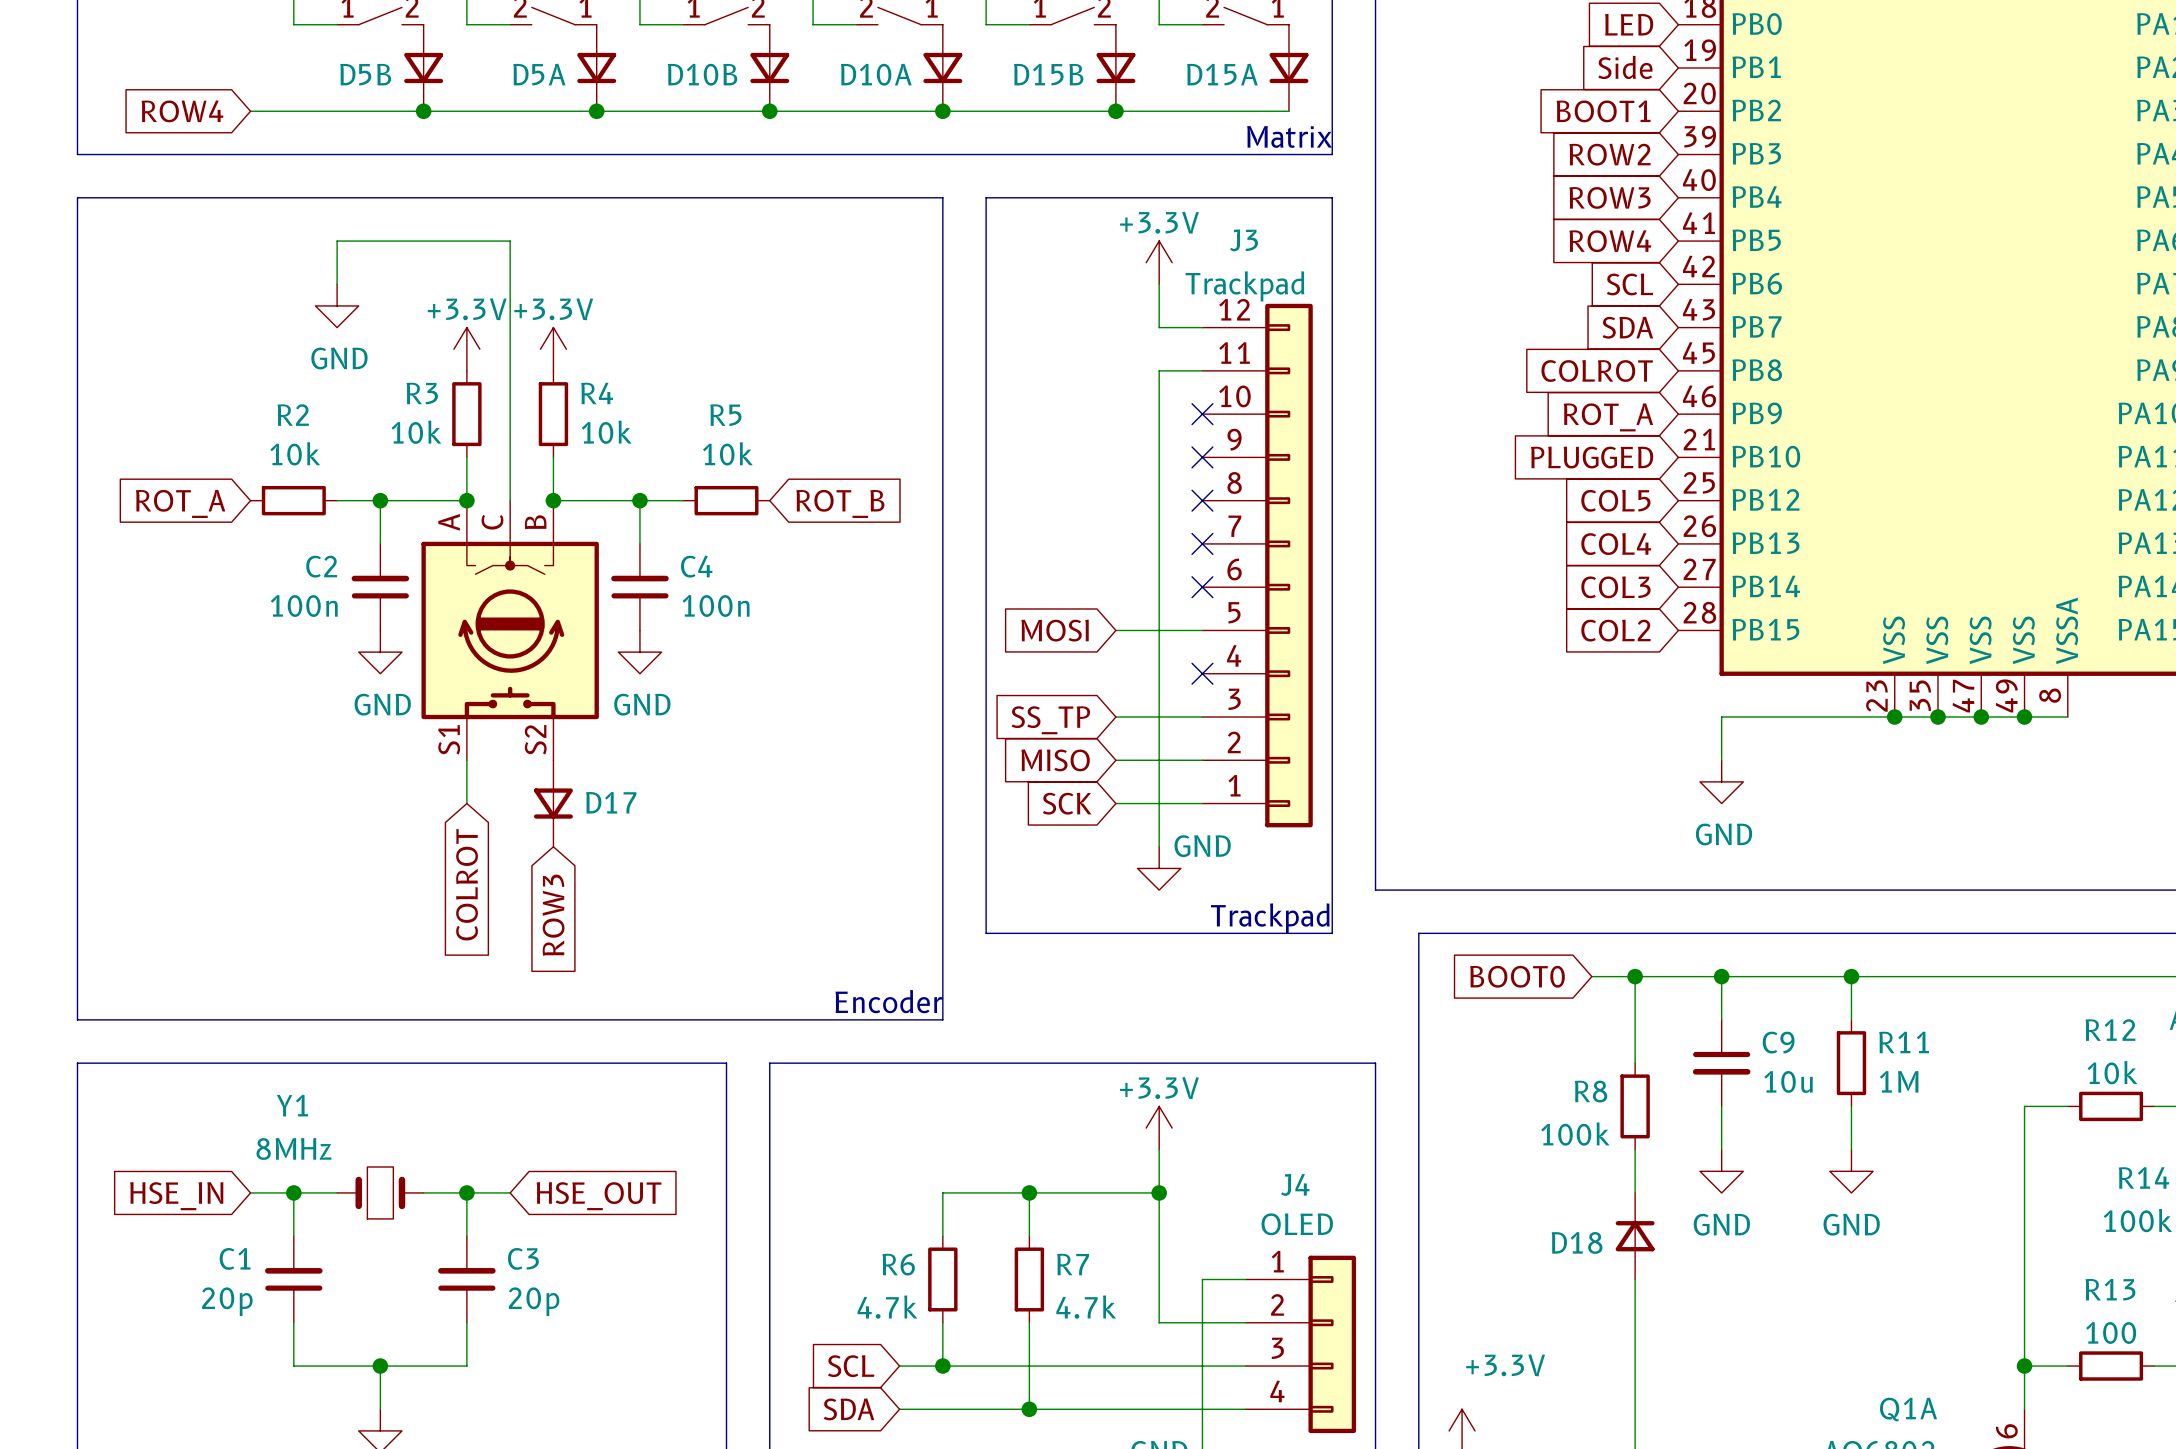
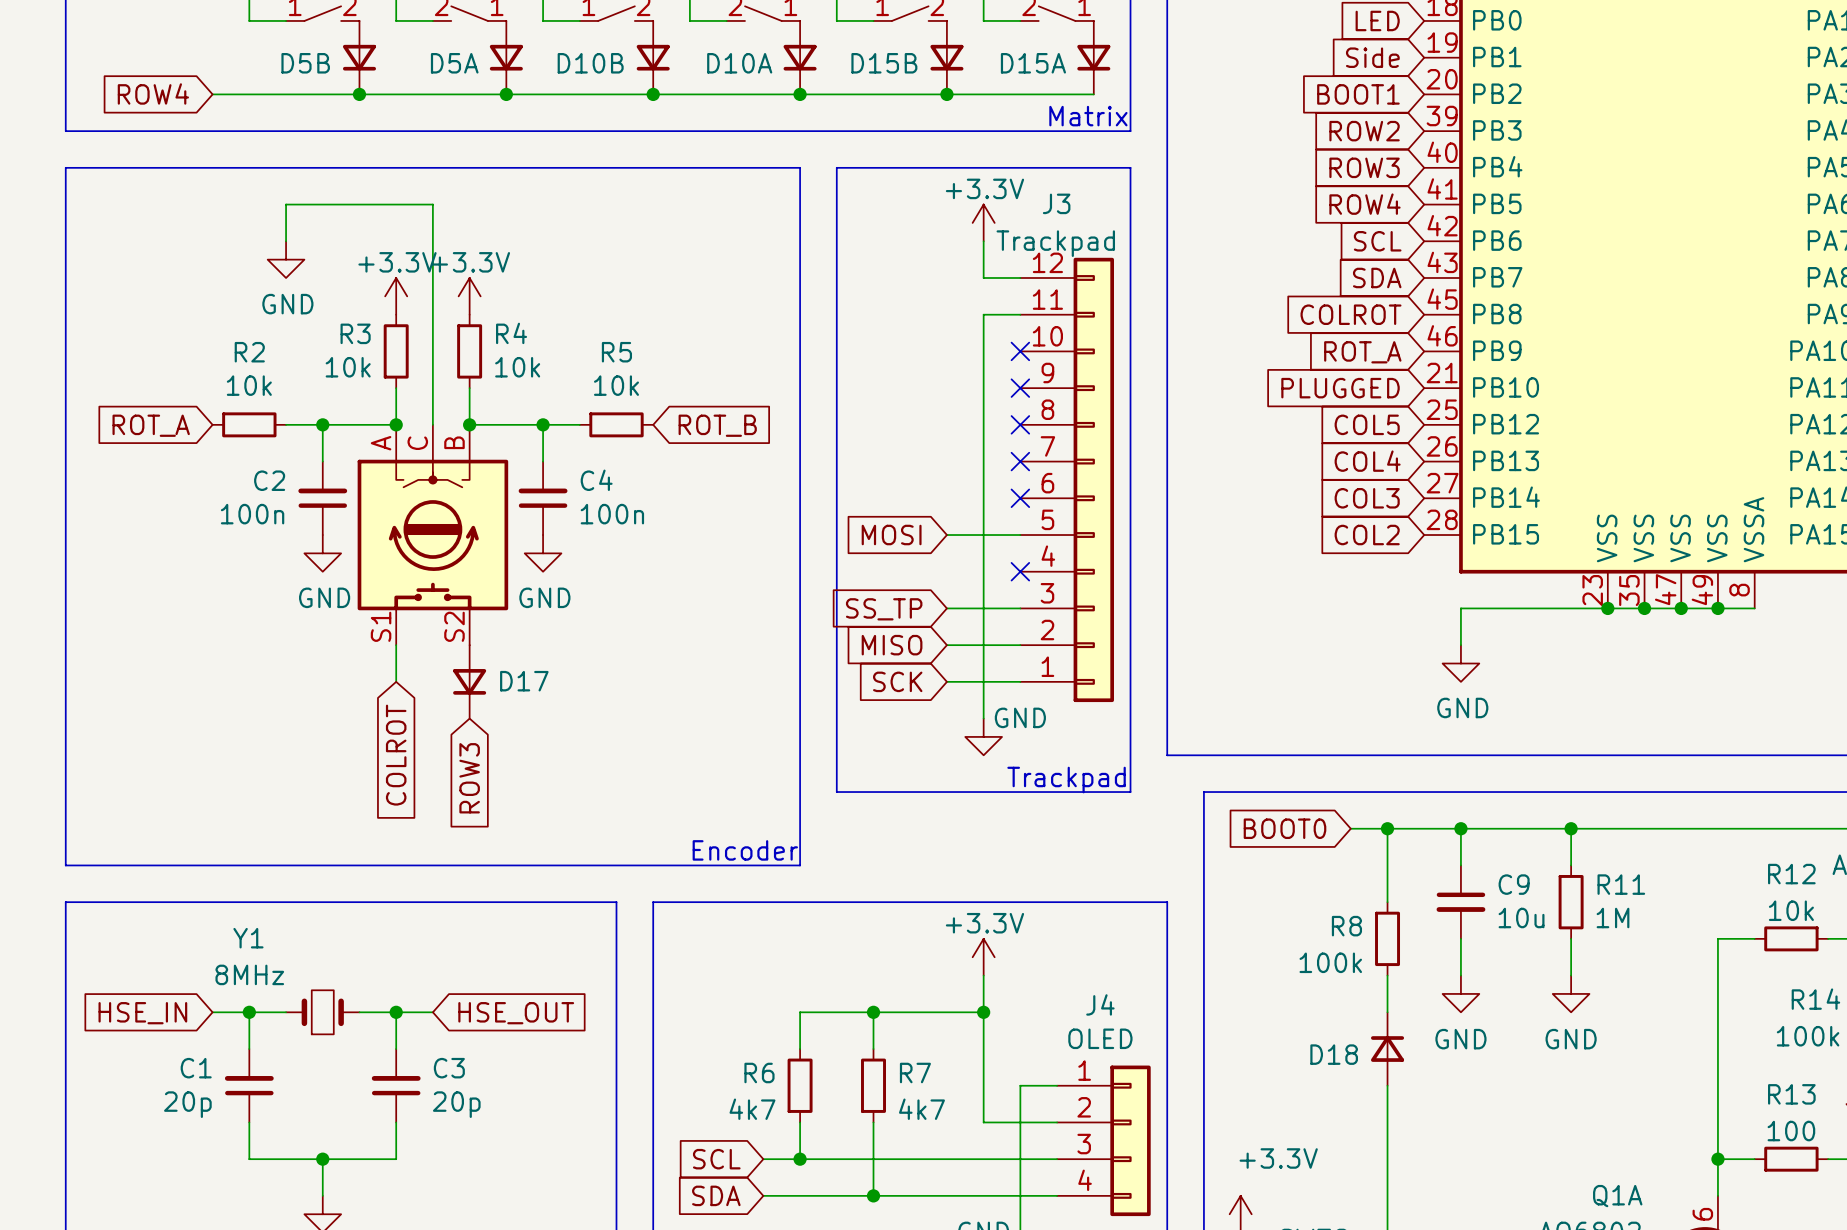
R6 value: 4.7k (887, 1307) -> 4k7 (752, 1109)
R7 value: 4.7k (1086, 1307) -> 4k7 (921, 1109)

